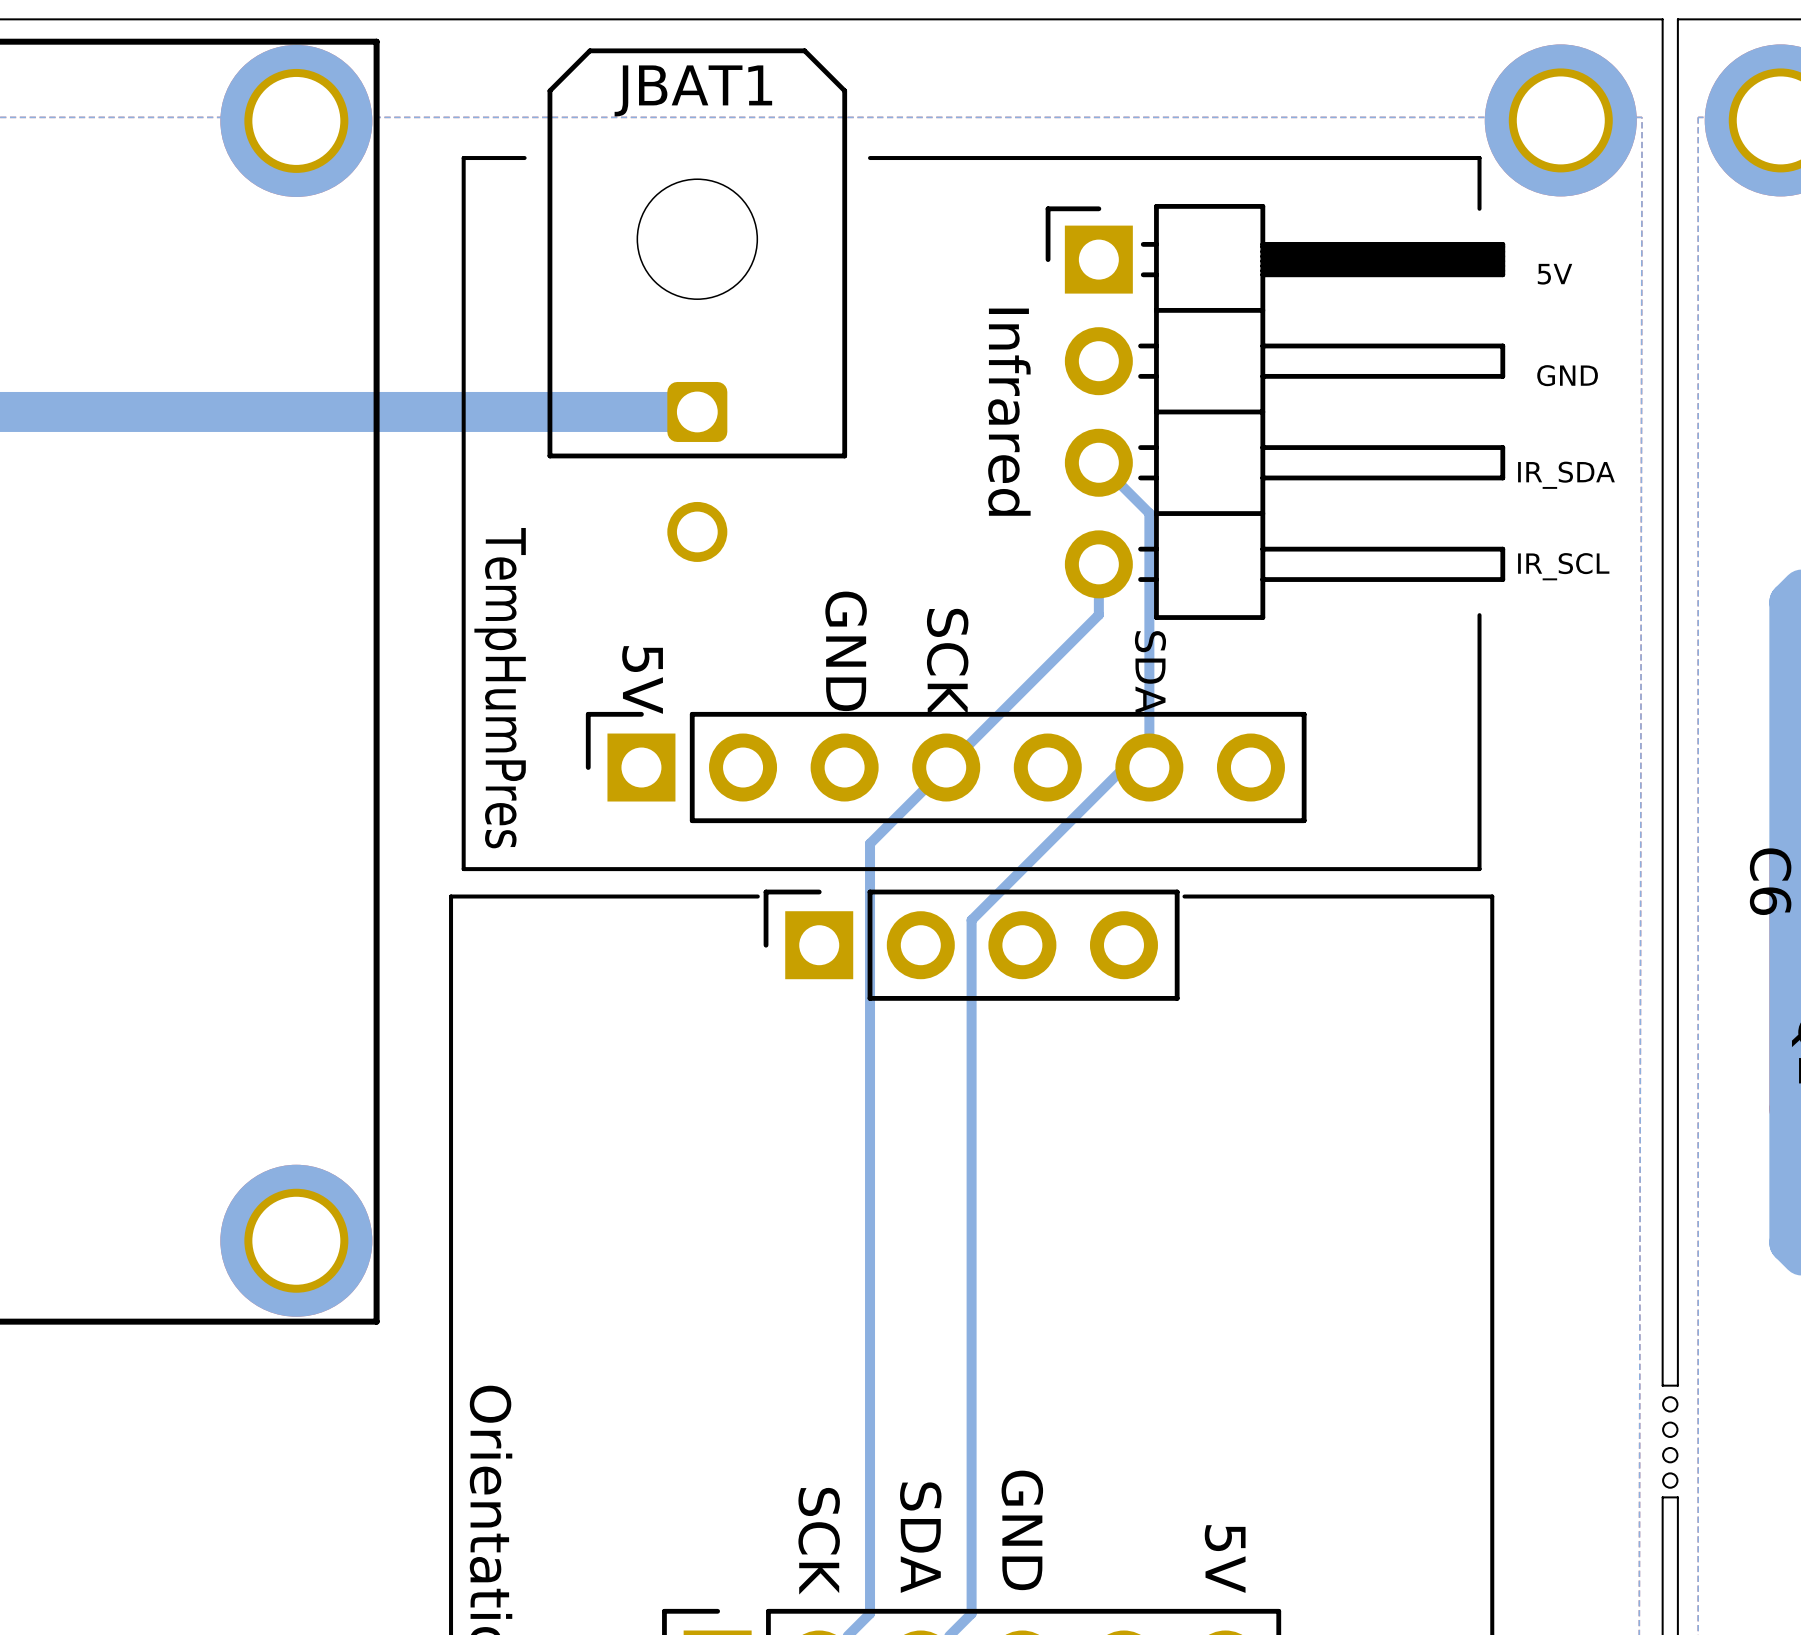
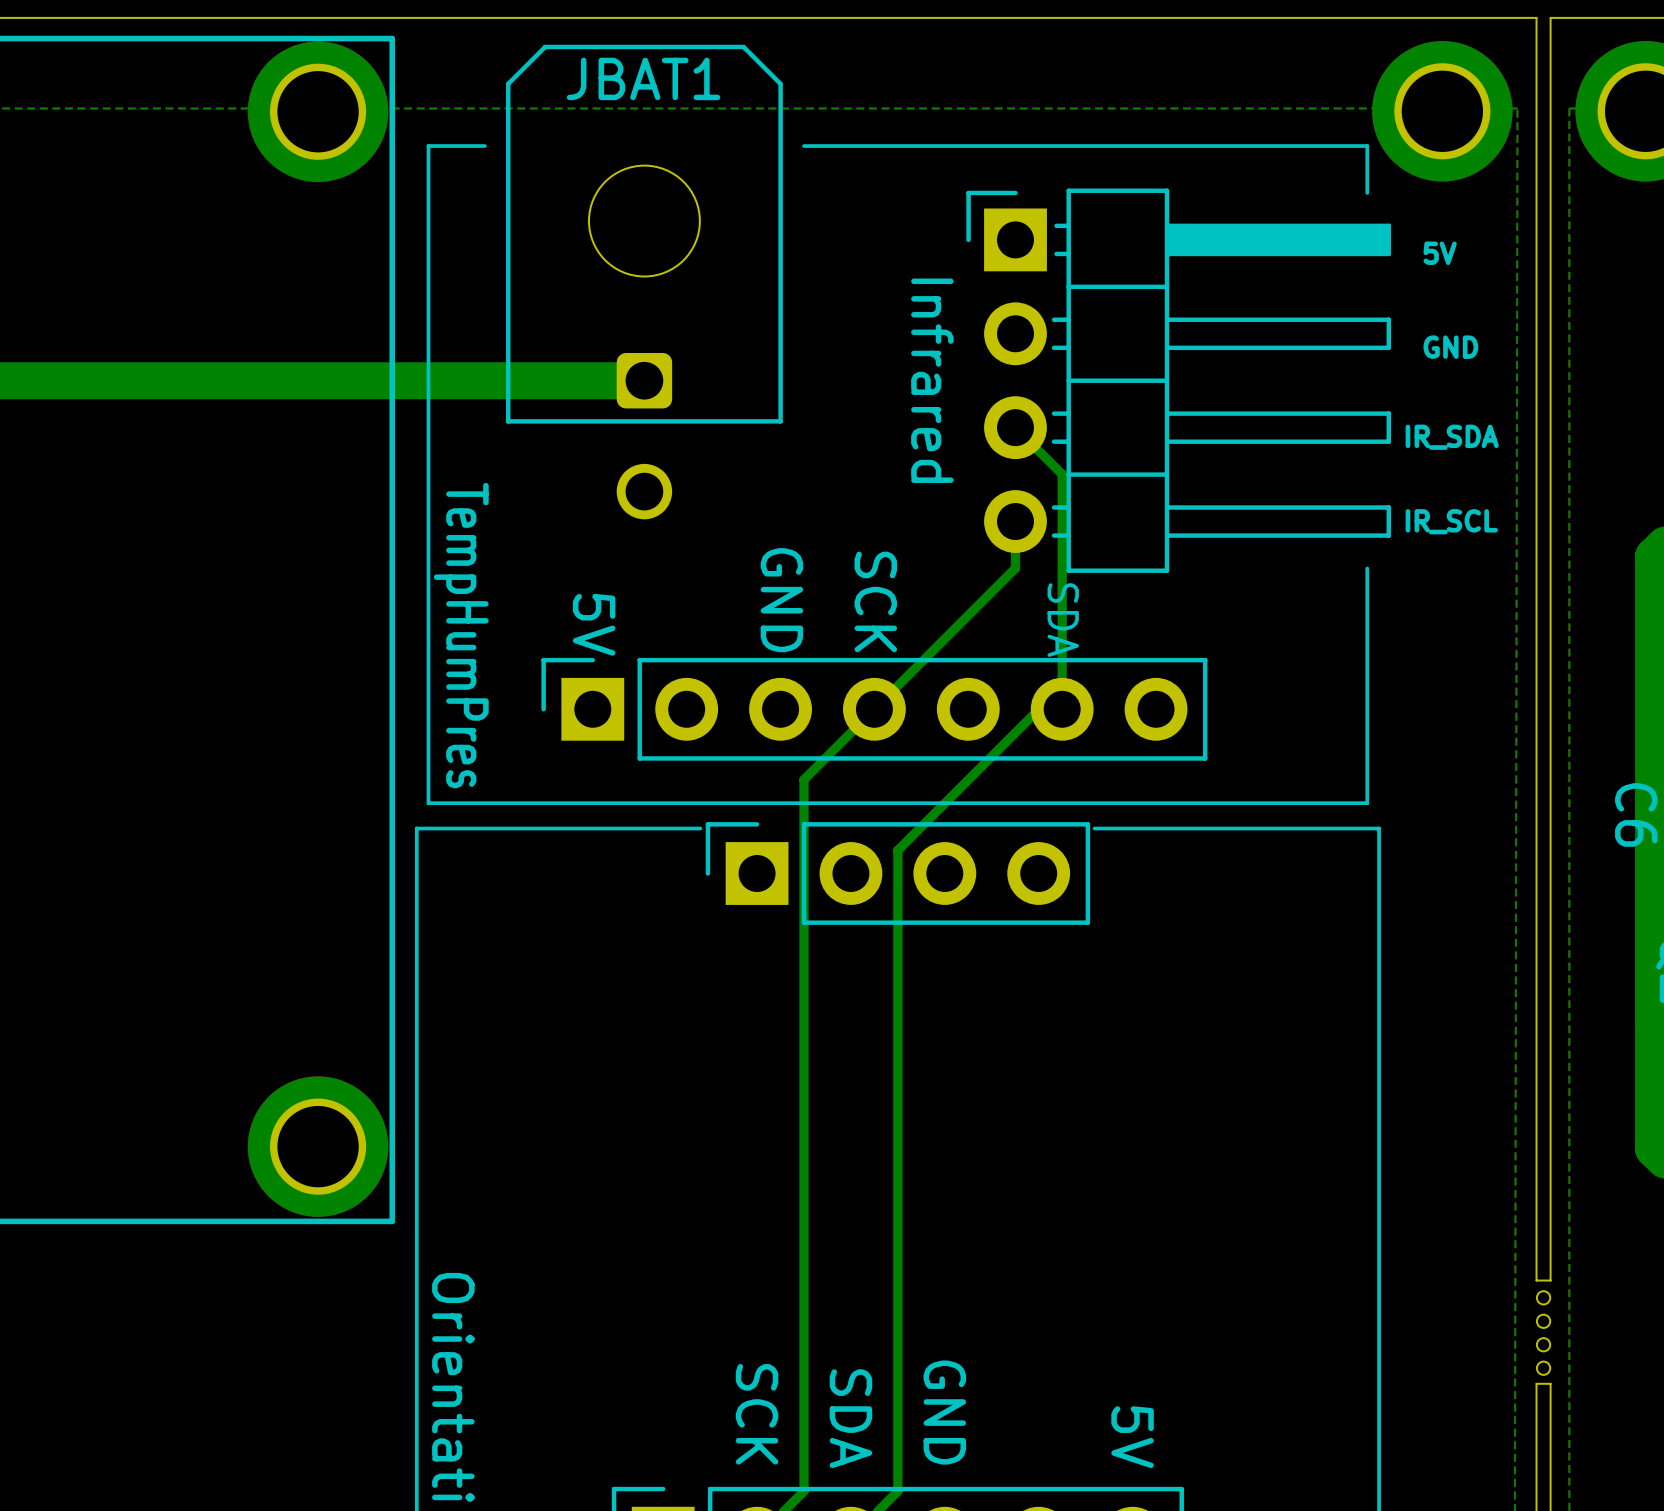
line: (376, 41) (376, 1321) -> (348, 38) (392, 38) (392, 1221) (348, 1221)
part position: (296, 120) -> (318, 111)
part position: (296, 1240) -> (318, 1146)

